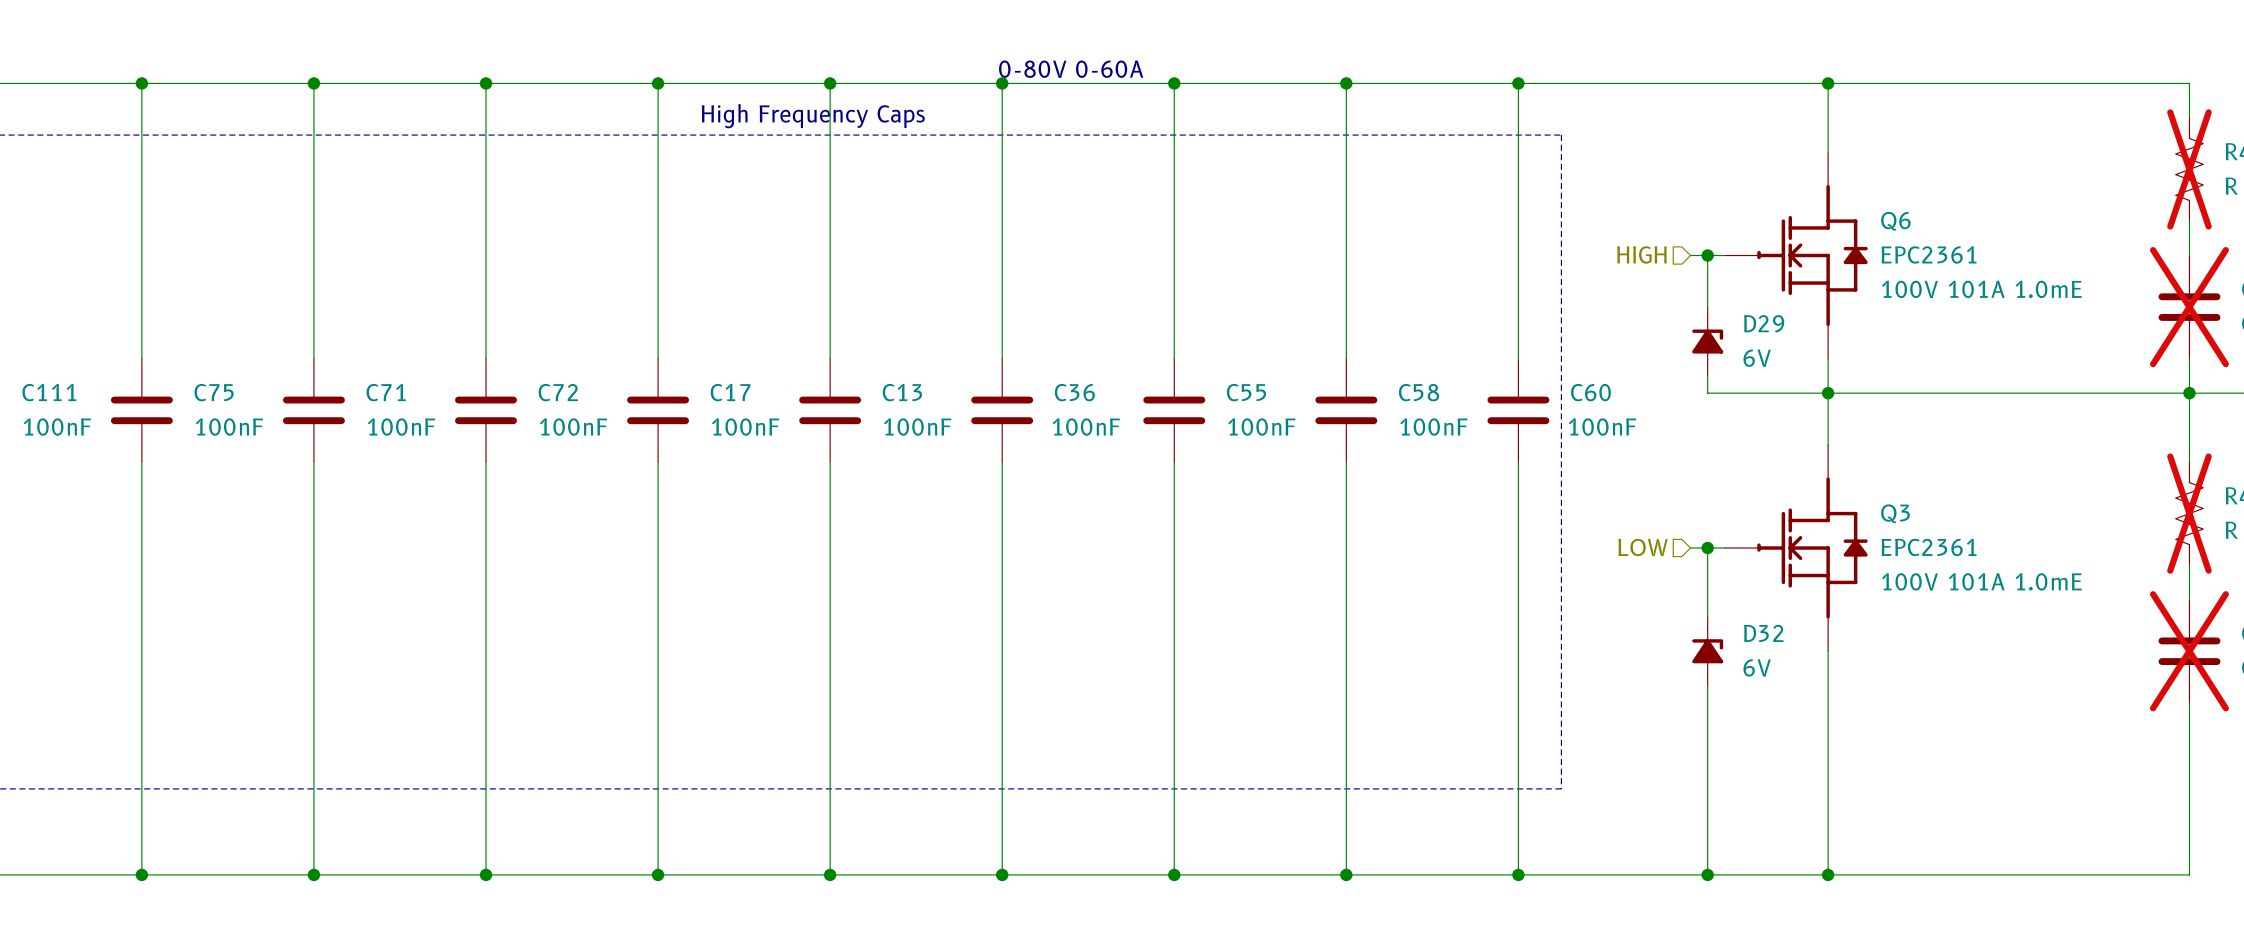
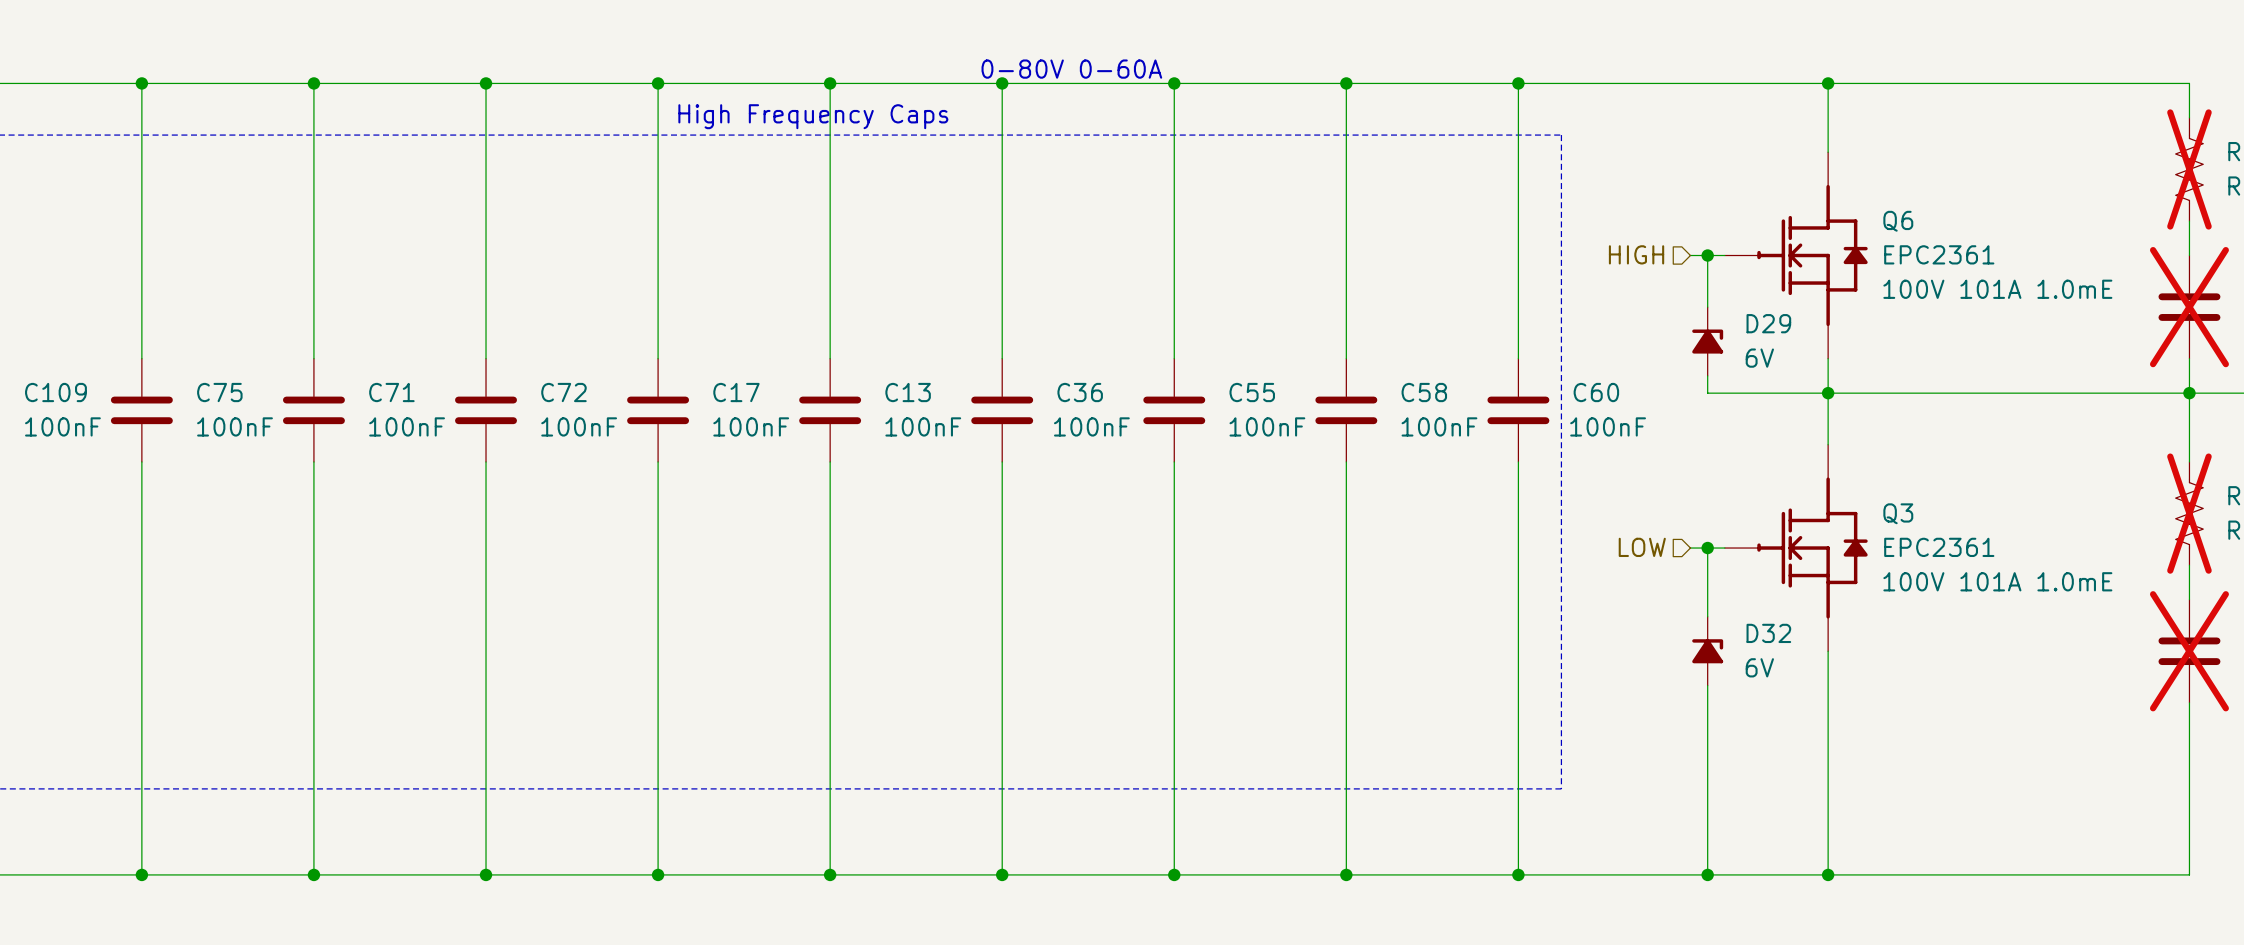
C111 name: C111 (49, 392) -> C109 (55, 392)

